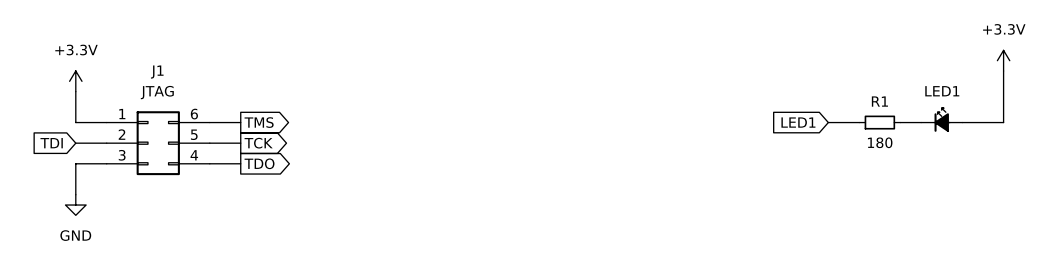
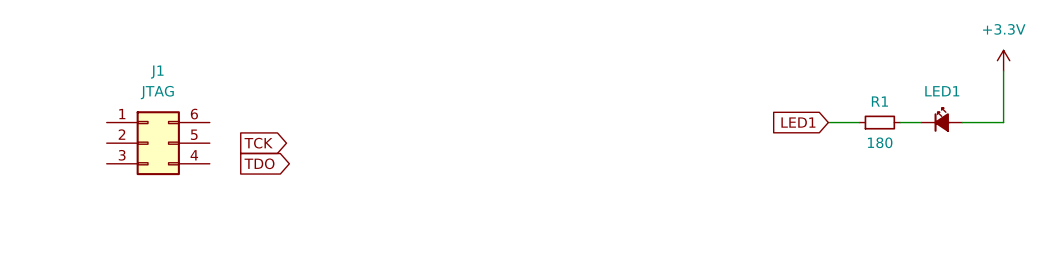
power symbol: +3.3V (75, 81) -> none
wire: (75, 91) (75, 122) (106, 122) -> none
wire: (209, 122) (240, 122) -> none
global label: TMS (259, 122) -> none
global label: TDI (51, 143) -> none
wire: (75, 143) (106, 143) -> none
wire: (209, 143) (240, 143) -> none
wire: (106, 163) (75, 163) (75, 194) -> none
wire: (209, 163) (240, 163) -> none
power symbol: GND (75, 205) -> none

